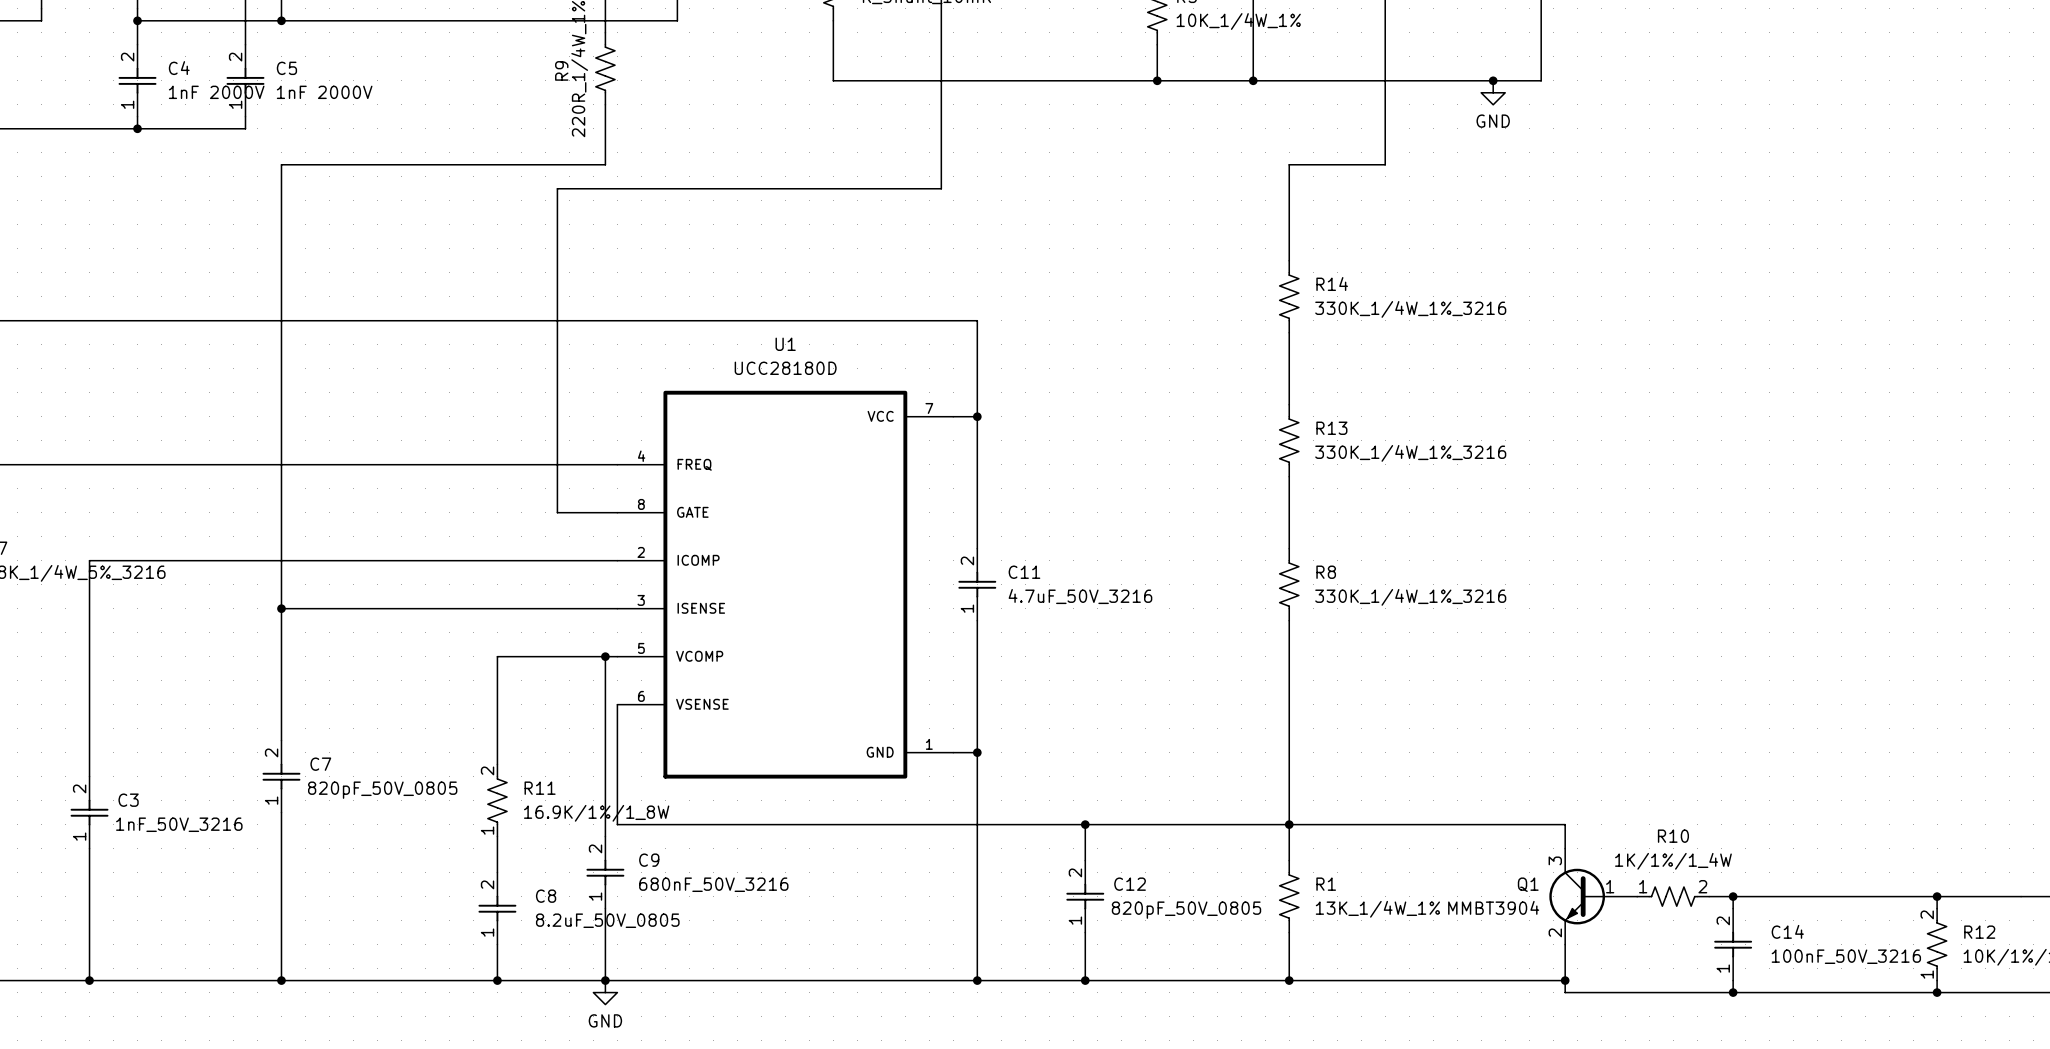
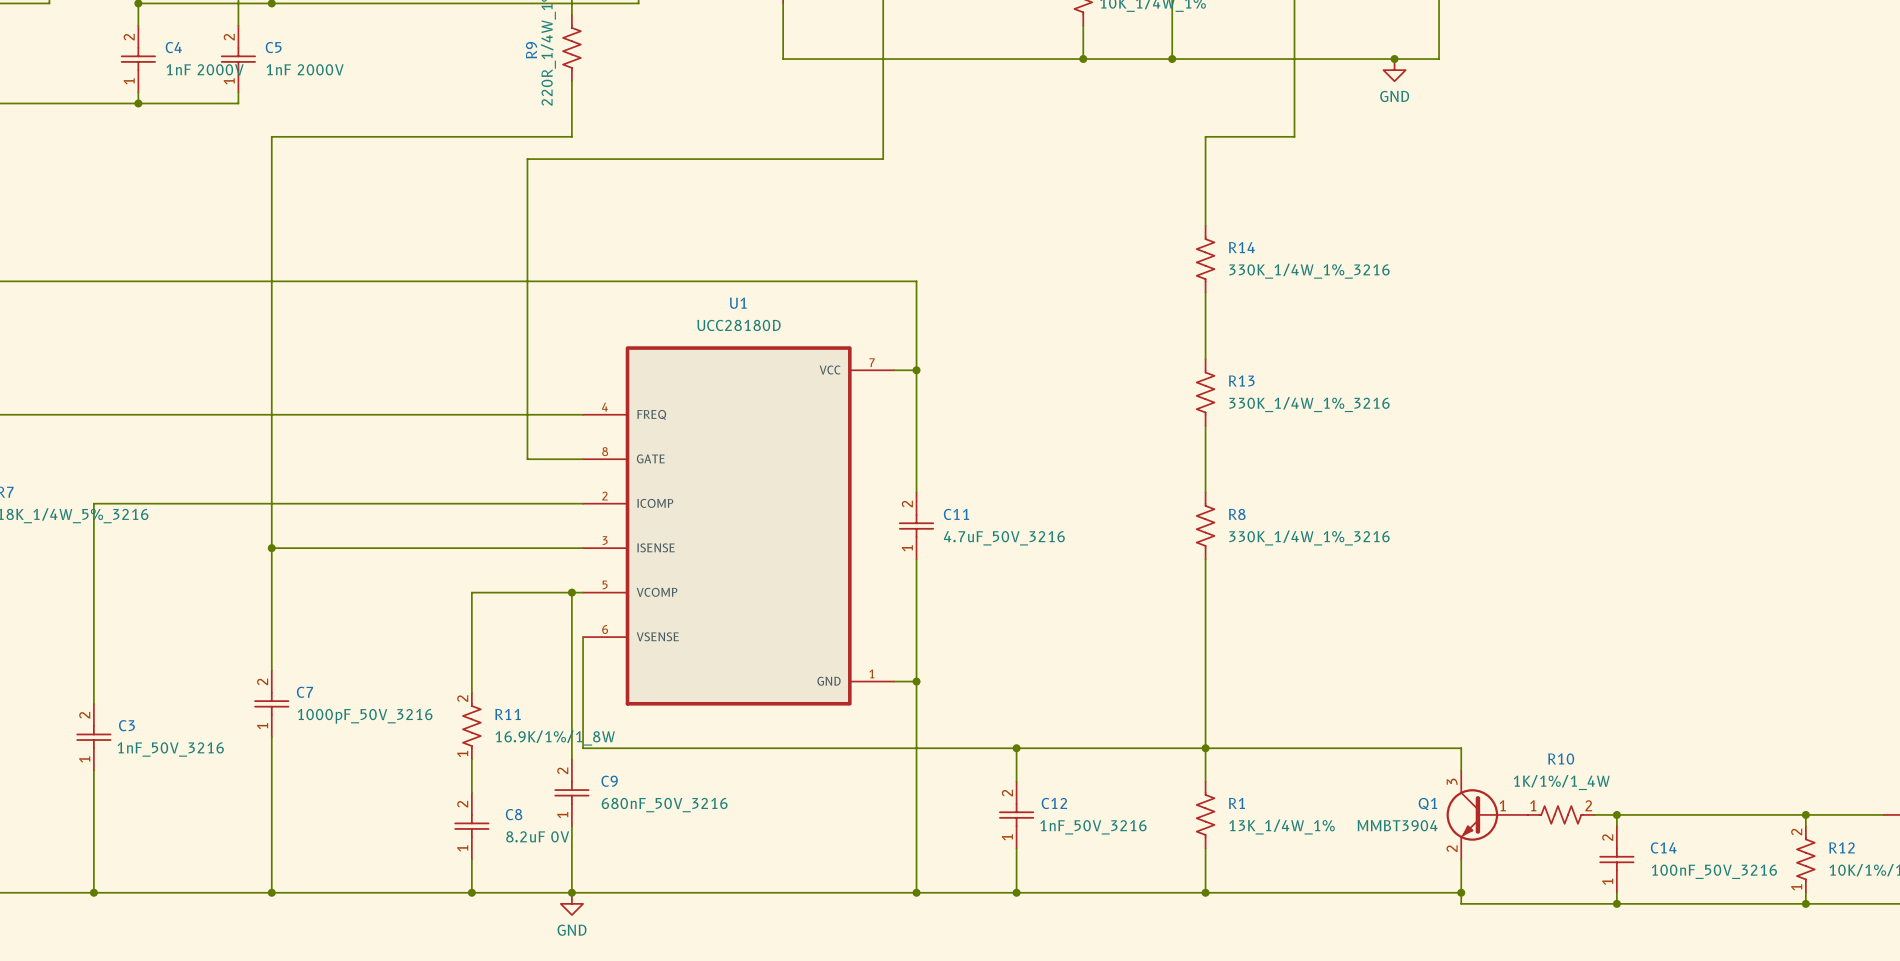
C7 value: 820pF_50V_0805 (382, 790) -> 1000pF_50V_3216 (365, 716)
C12 value: 820pF_50V_0805 (1186, 910) -> 1nF_50V_3216 (1093, 827)
C8 value: 8.2uF_50V_0805 (607, 920) -> 8.2uF 0V (537, 836)

